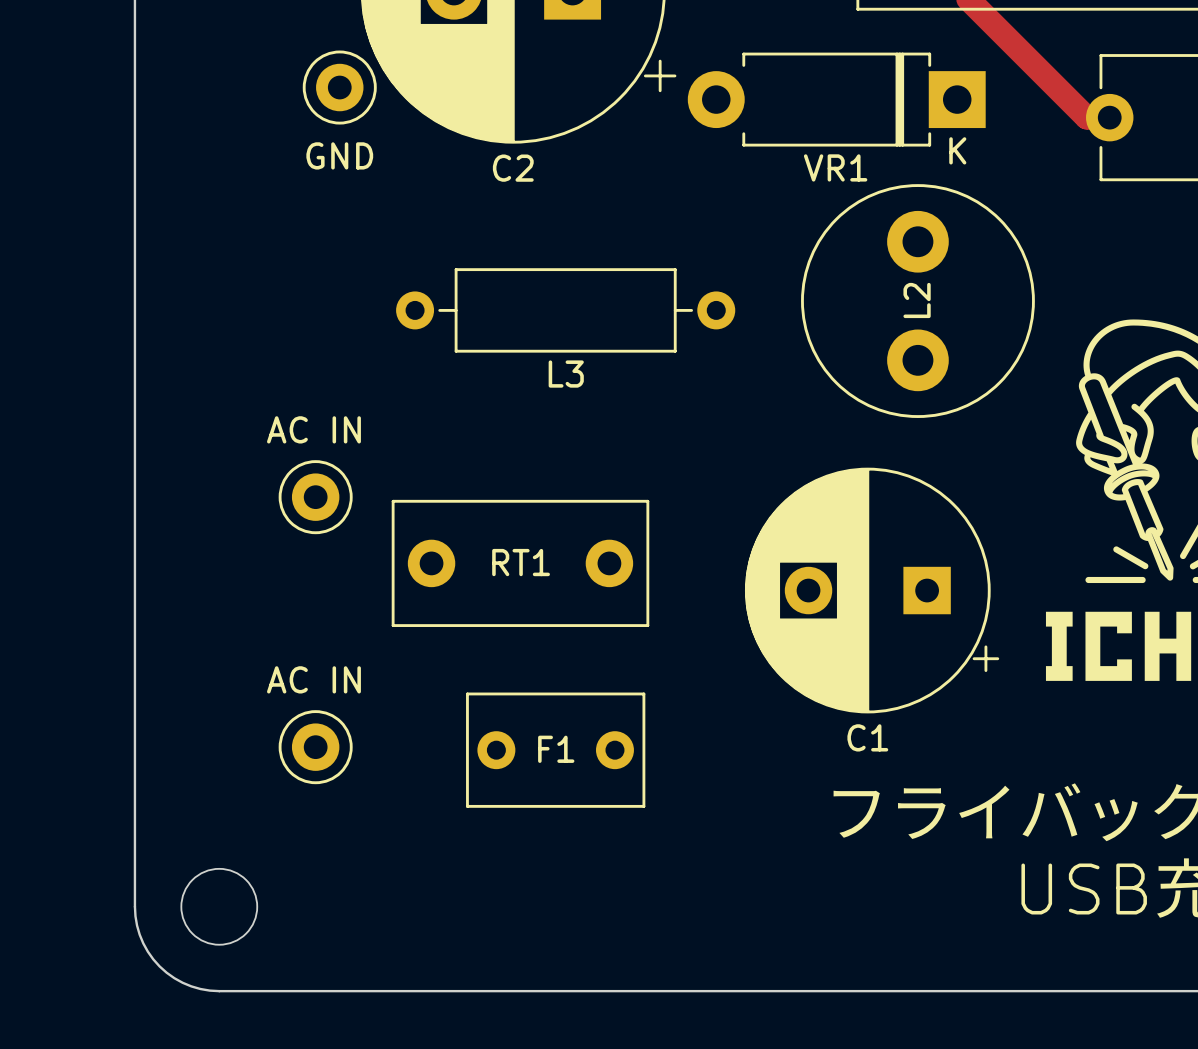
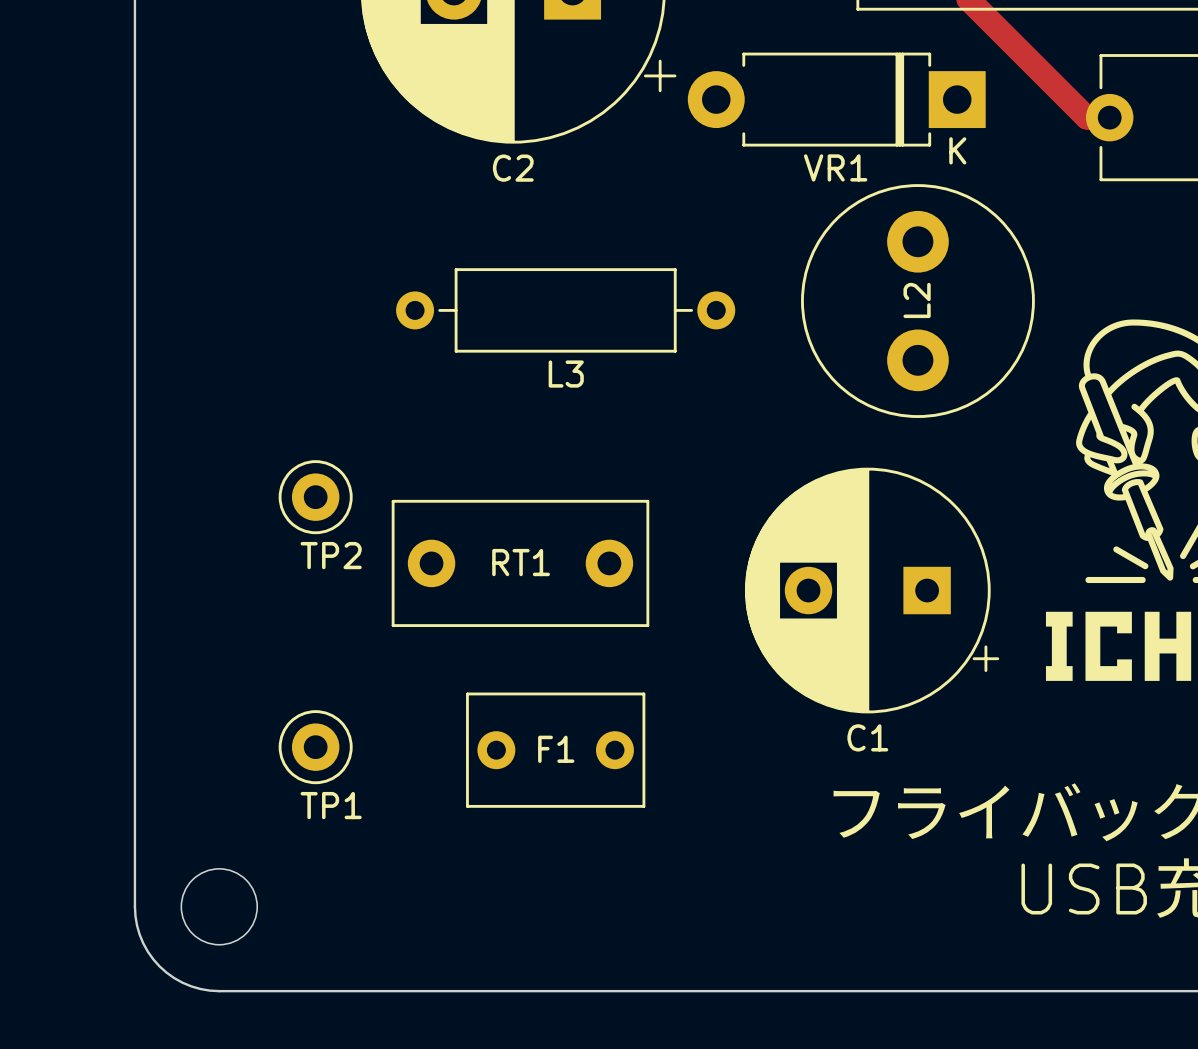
part: GND (339, 87) -> none
TP2 value: AC IN (313, 429) -> none
TP2 name: none -> TP2 (331, 555)
TP1 value: AC IN (313, 679) -> none
TP1 name: none -> TP1 (331, 805)

